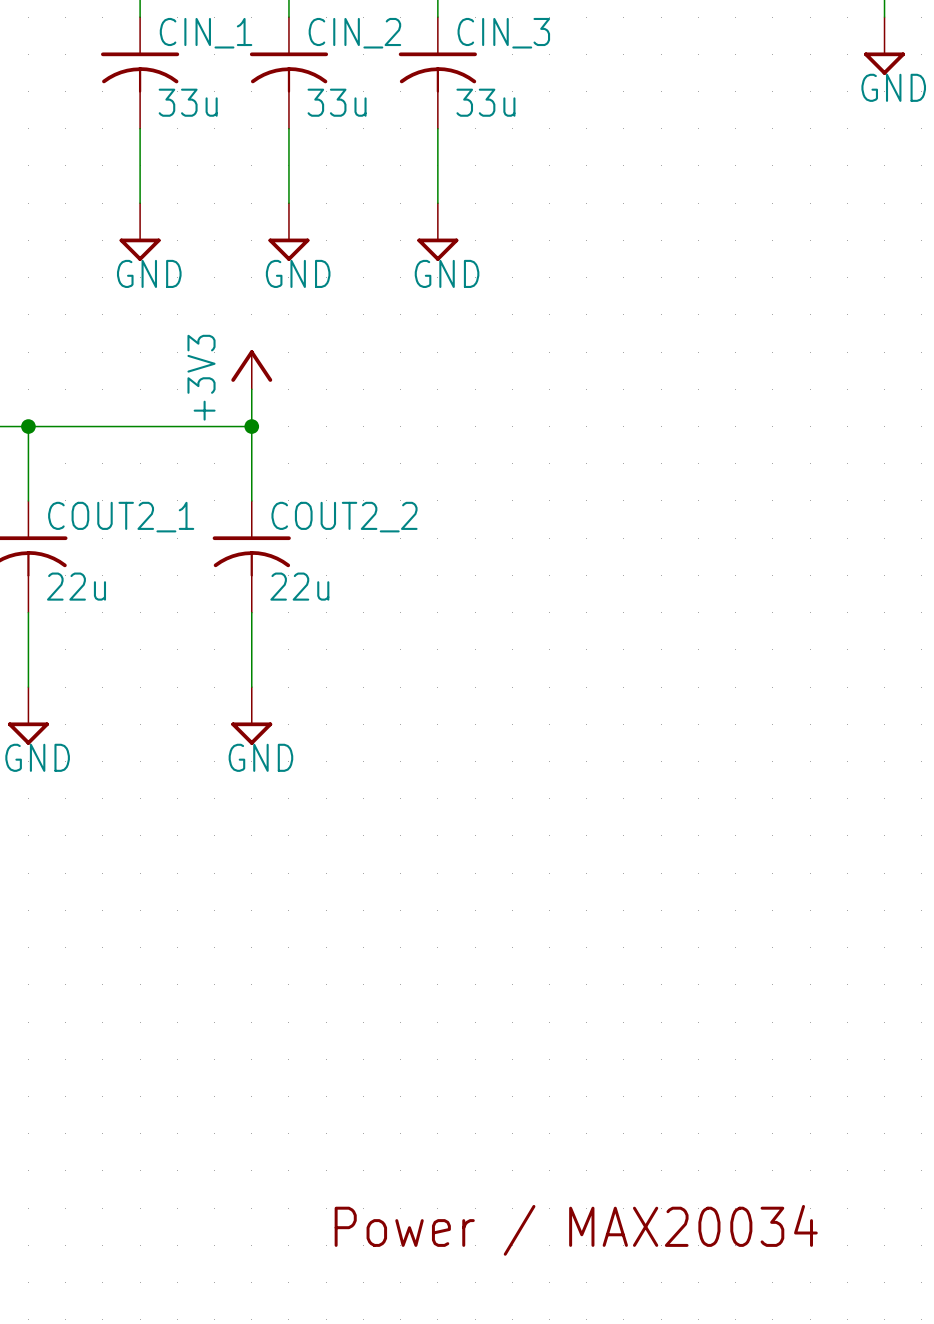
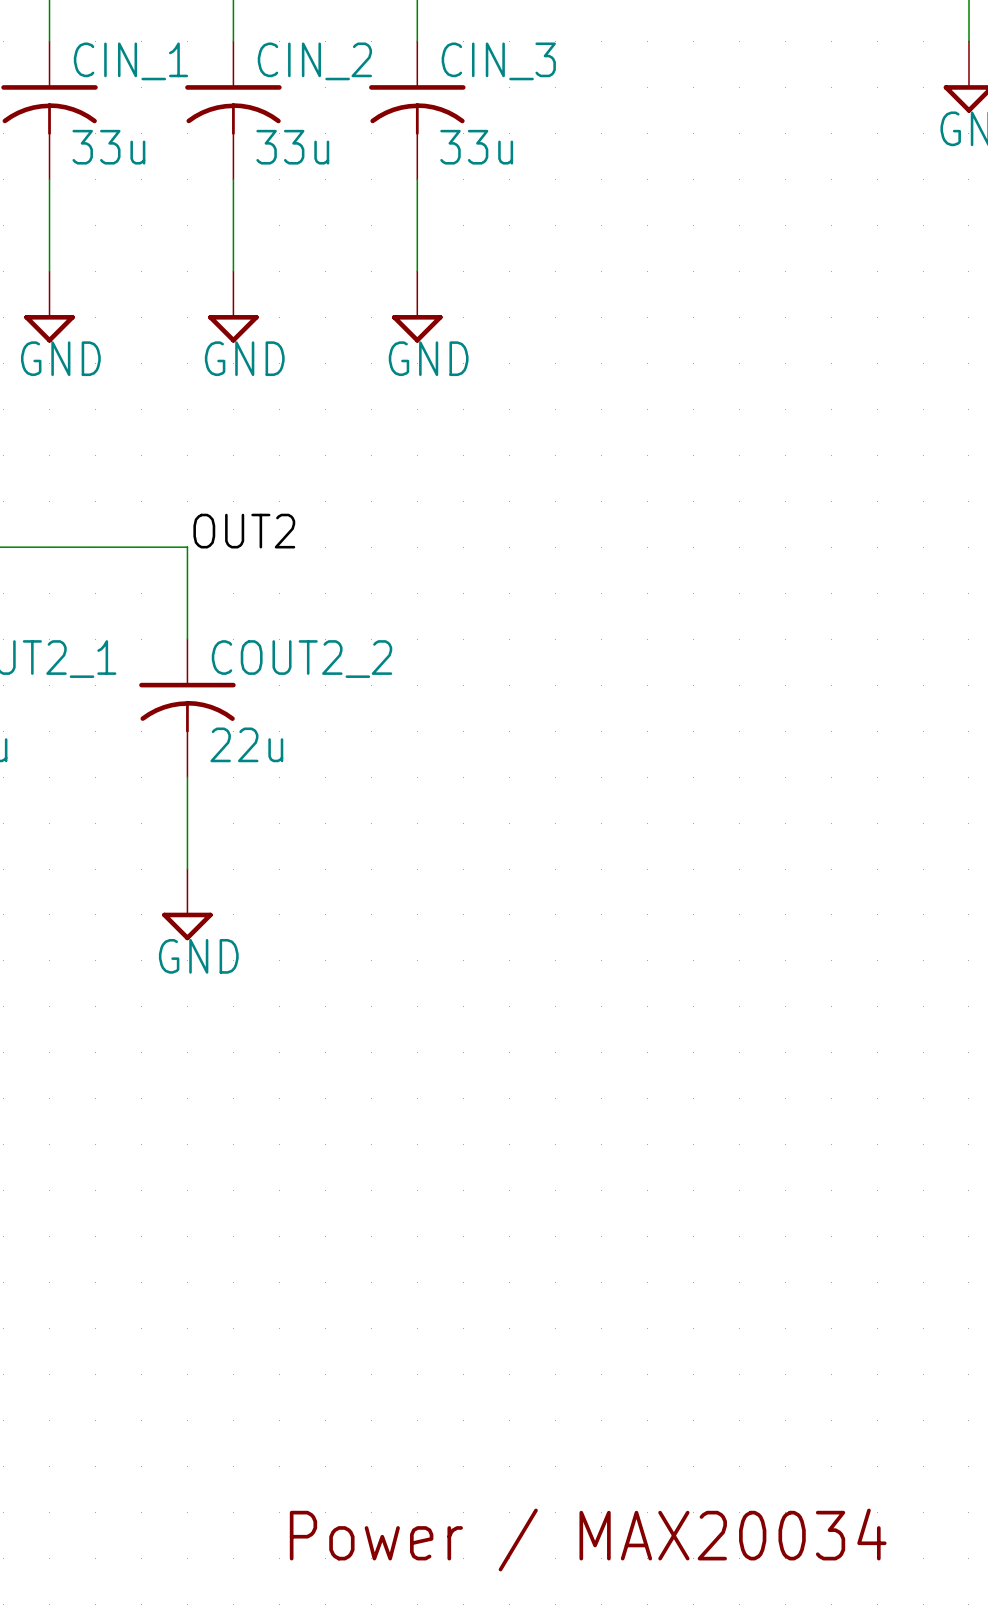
power symbol: +3V3 (251, 369) -> none
wire: (251, 389) (251, 426) -> none
label: none -> OUT2 (244, 531)
junction: (251, 426) -> none

